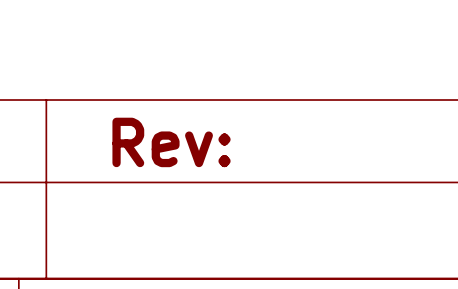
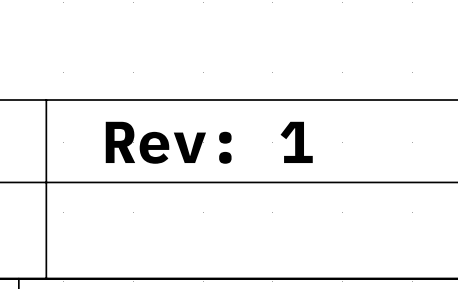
title block: Rev: (171, 142) -> Rev: 1 (209, 142)

